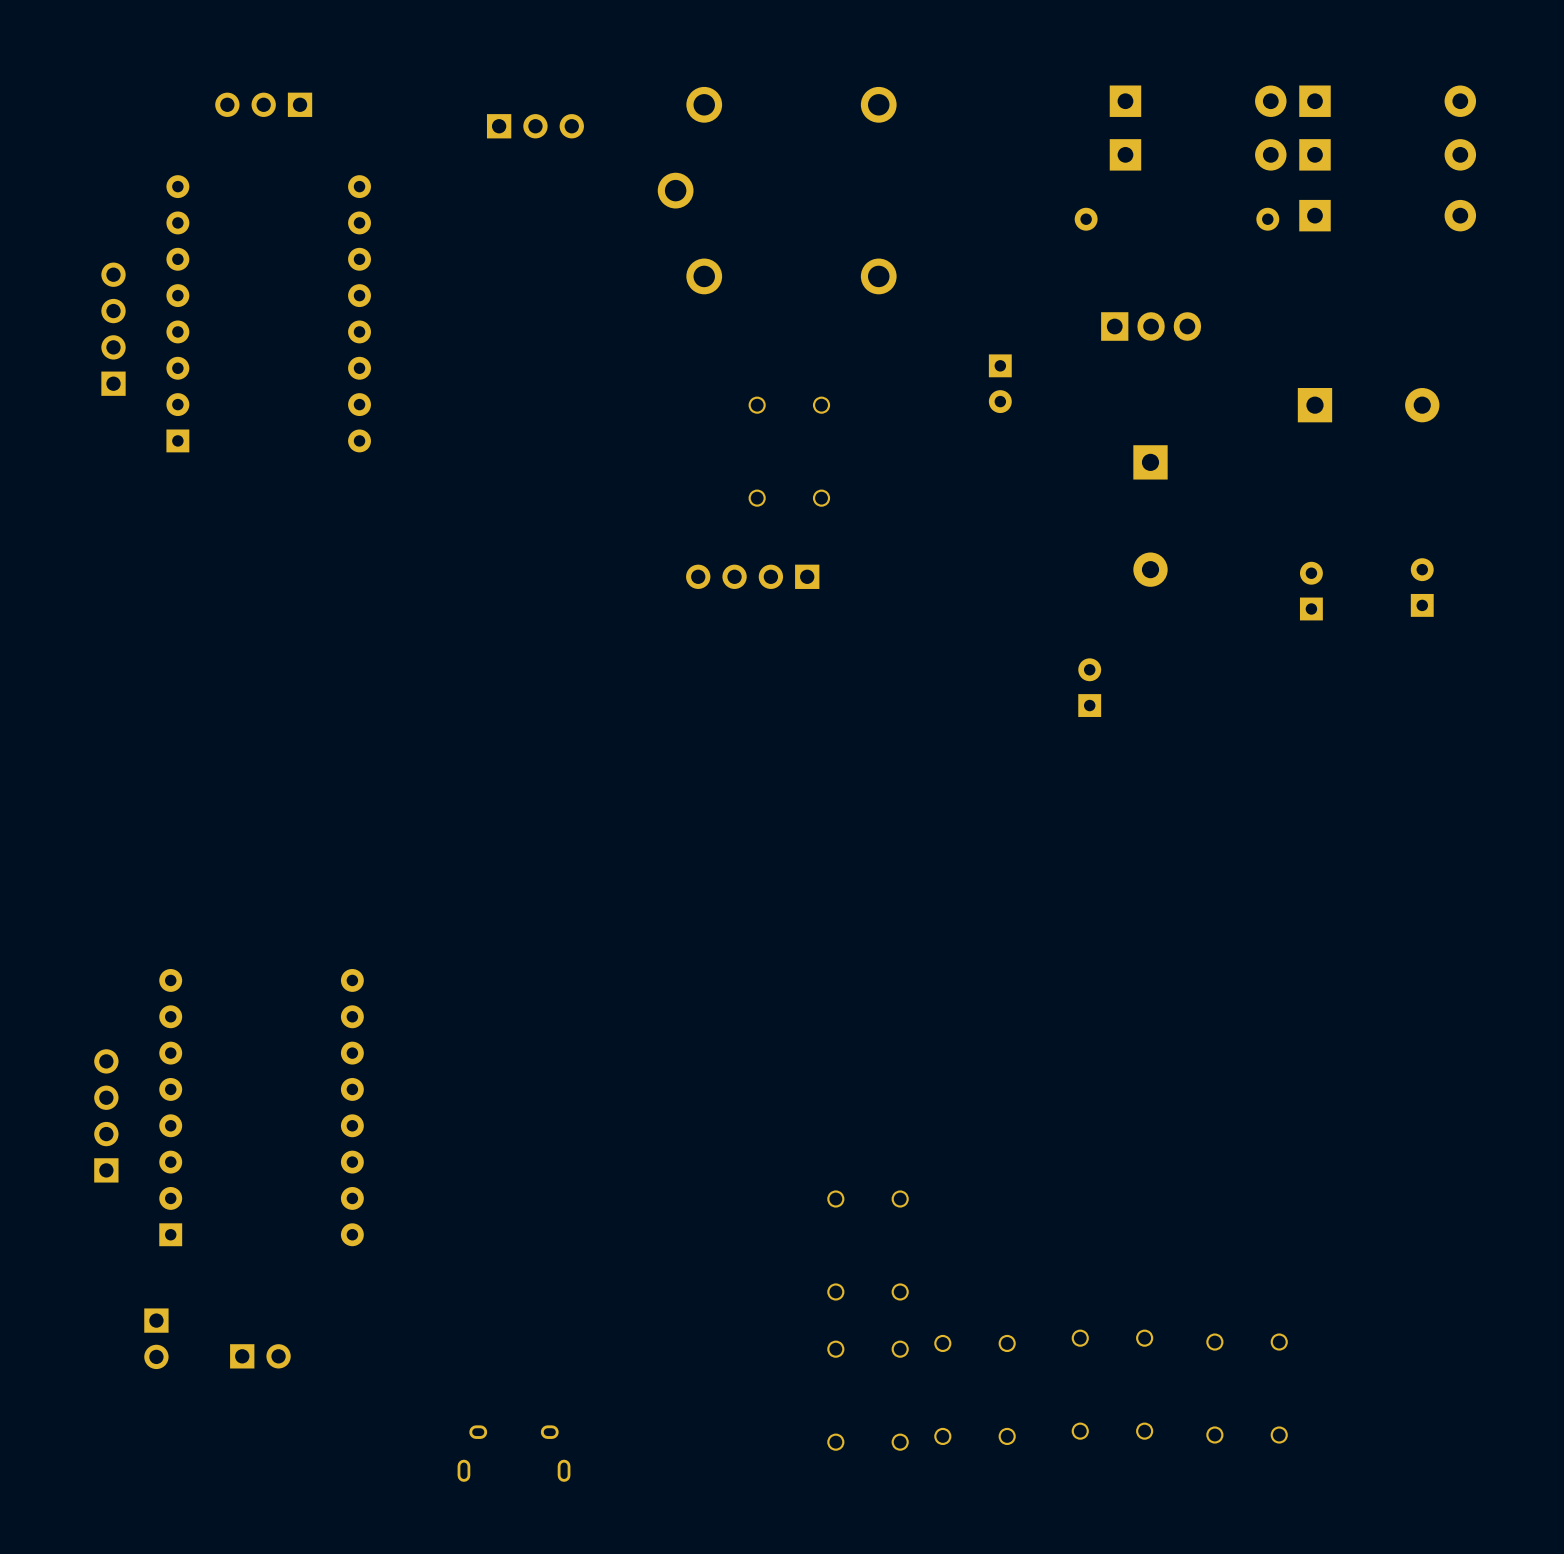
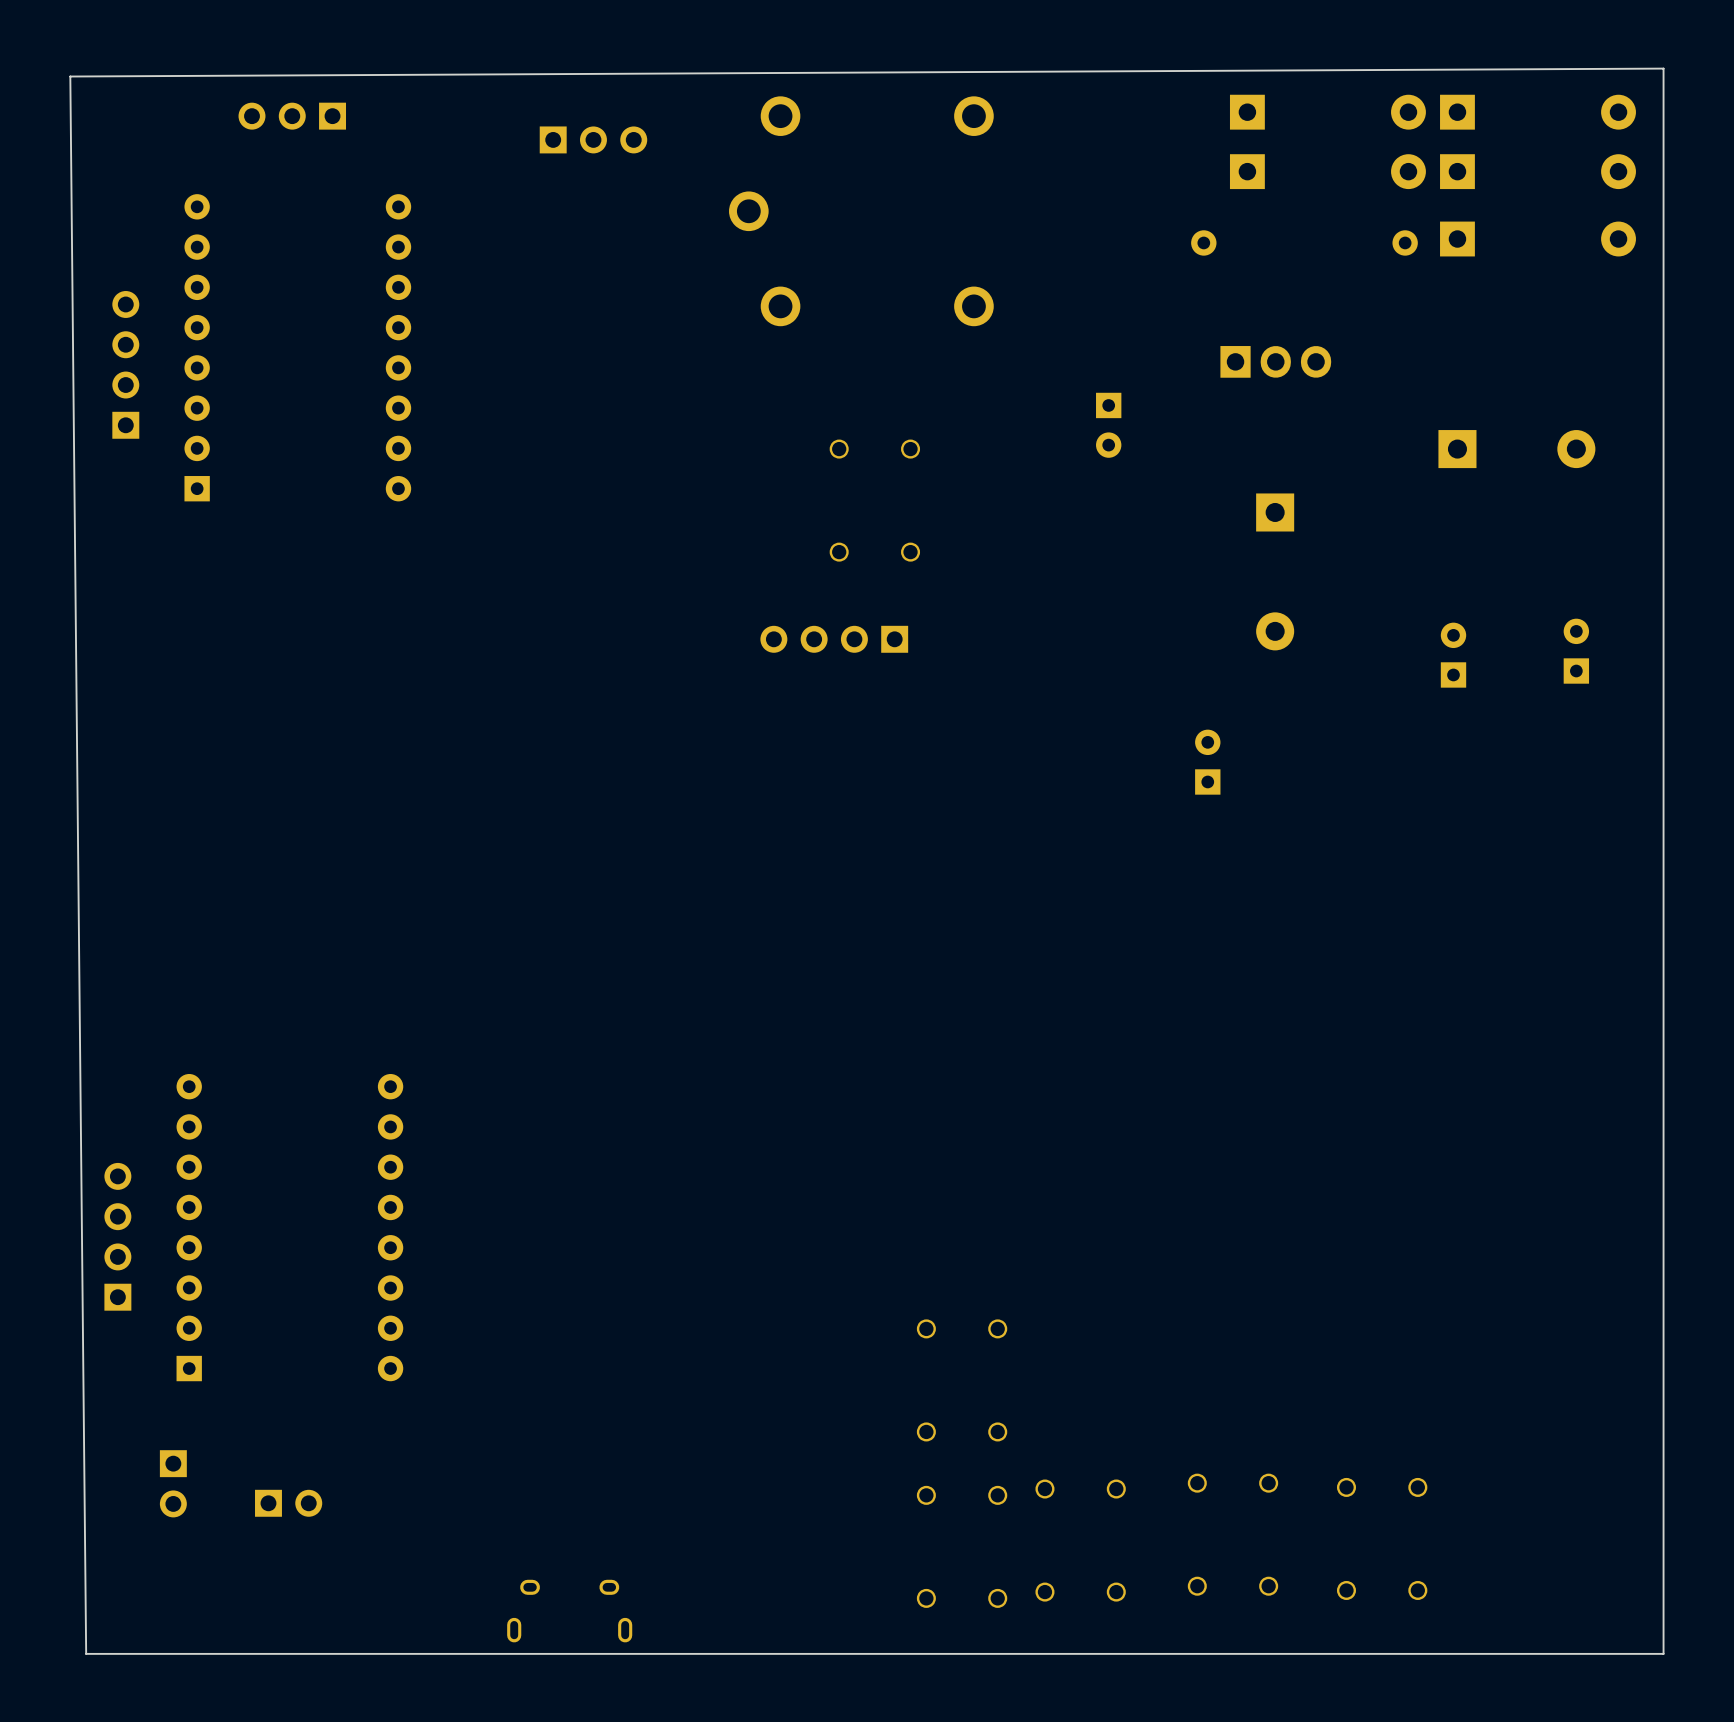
board edge: none -> (1663, 68) (1663, 1653) (86, 1653) (70, 76) (1663, 68)

